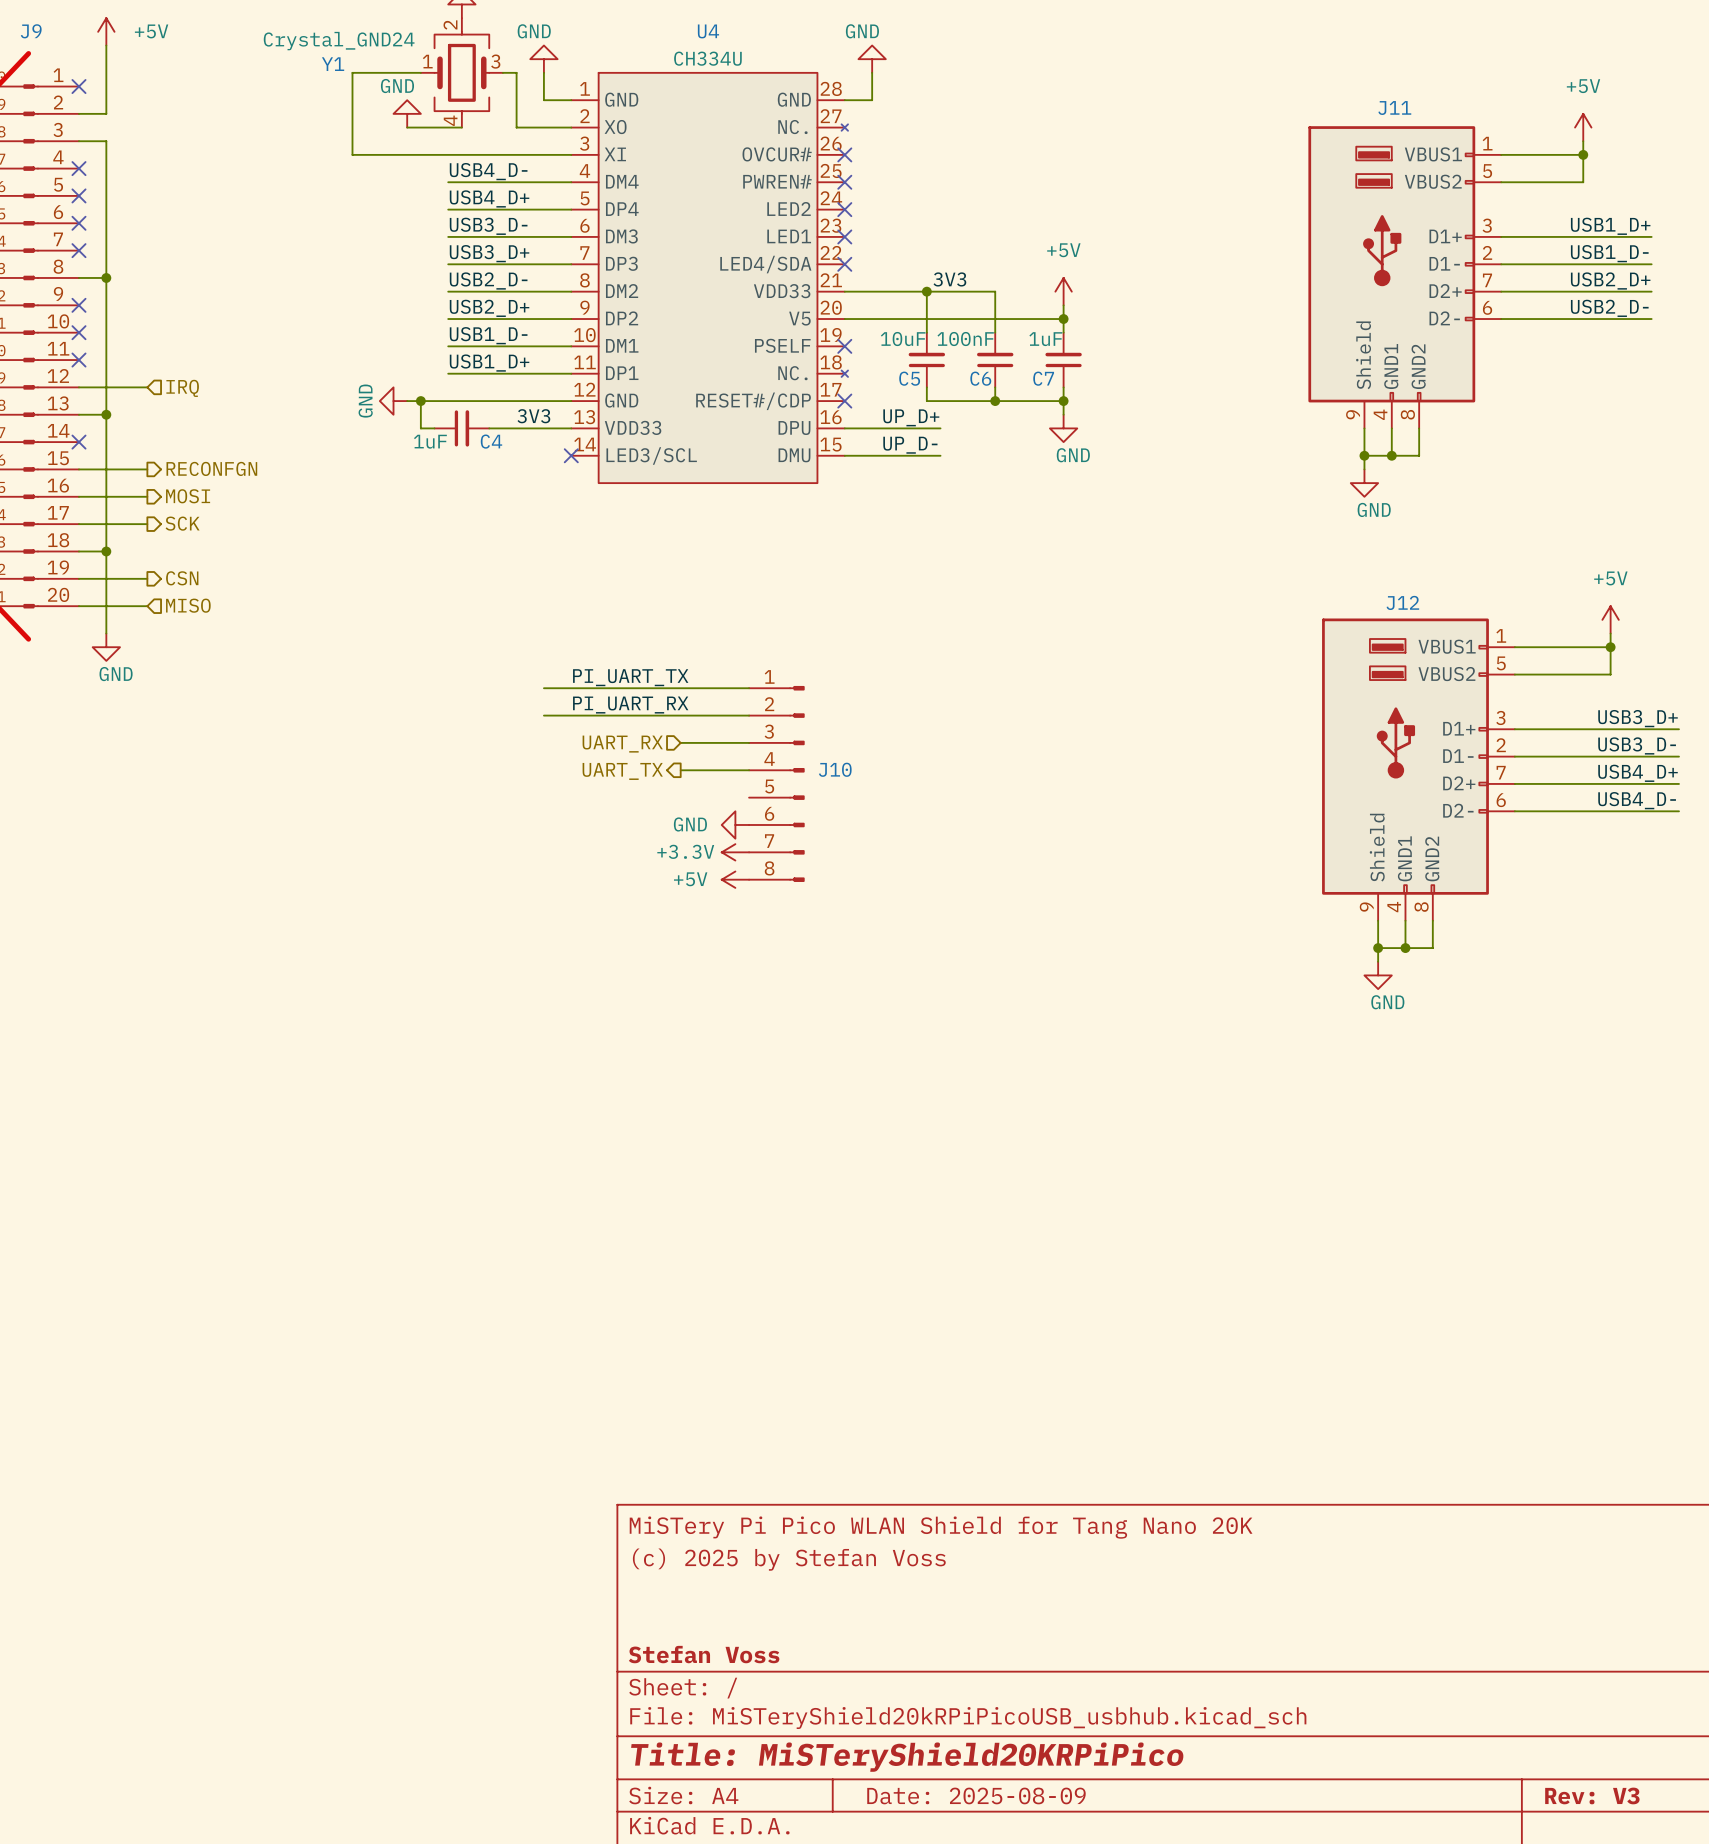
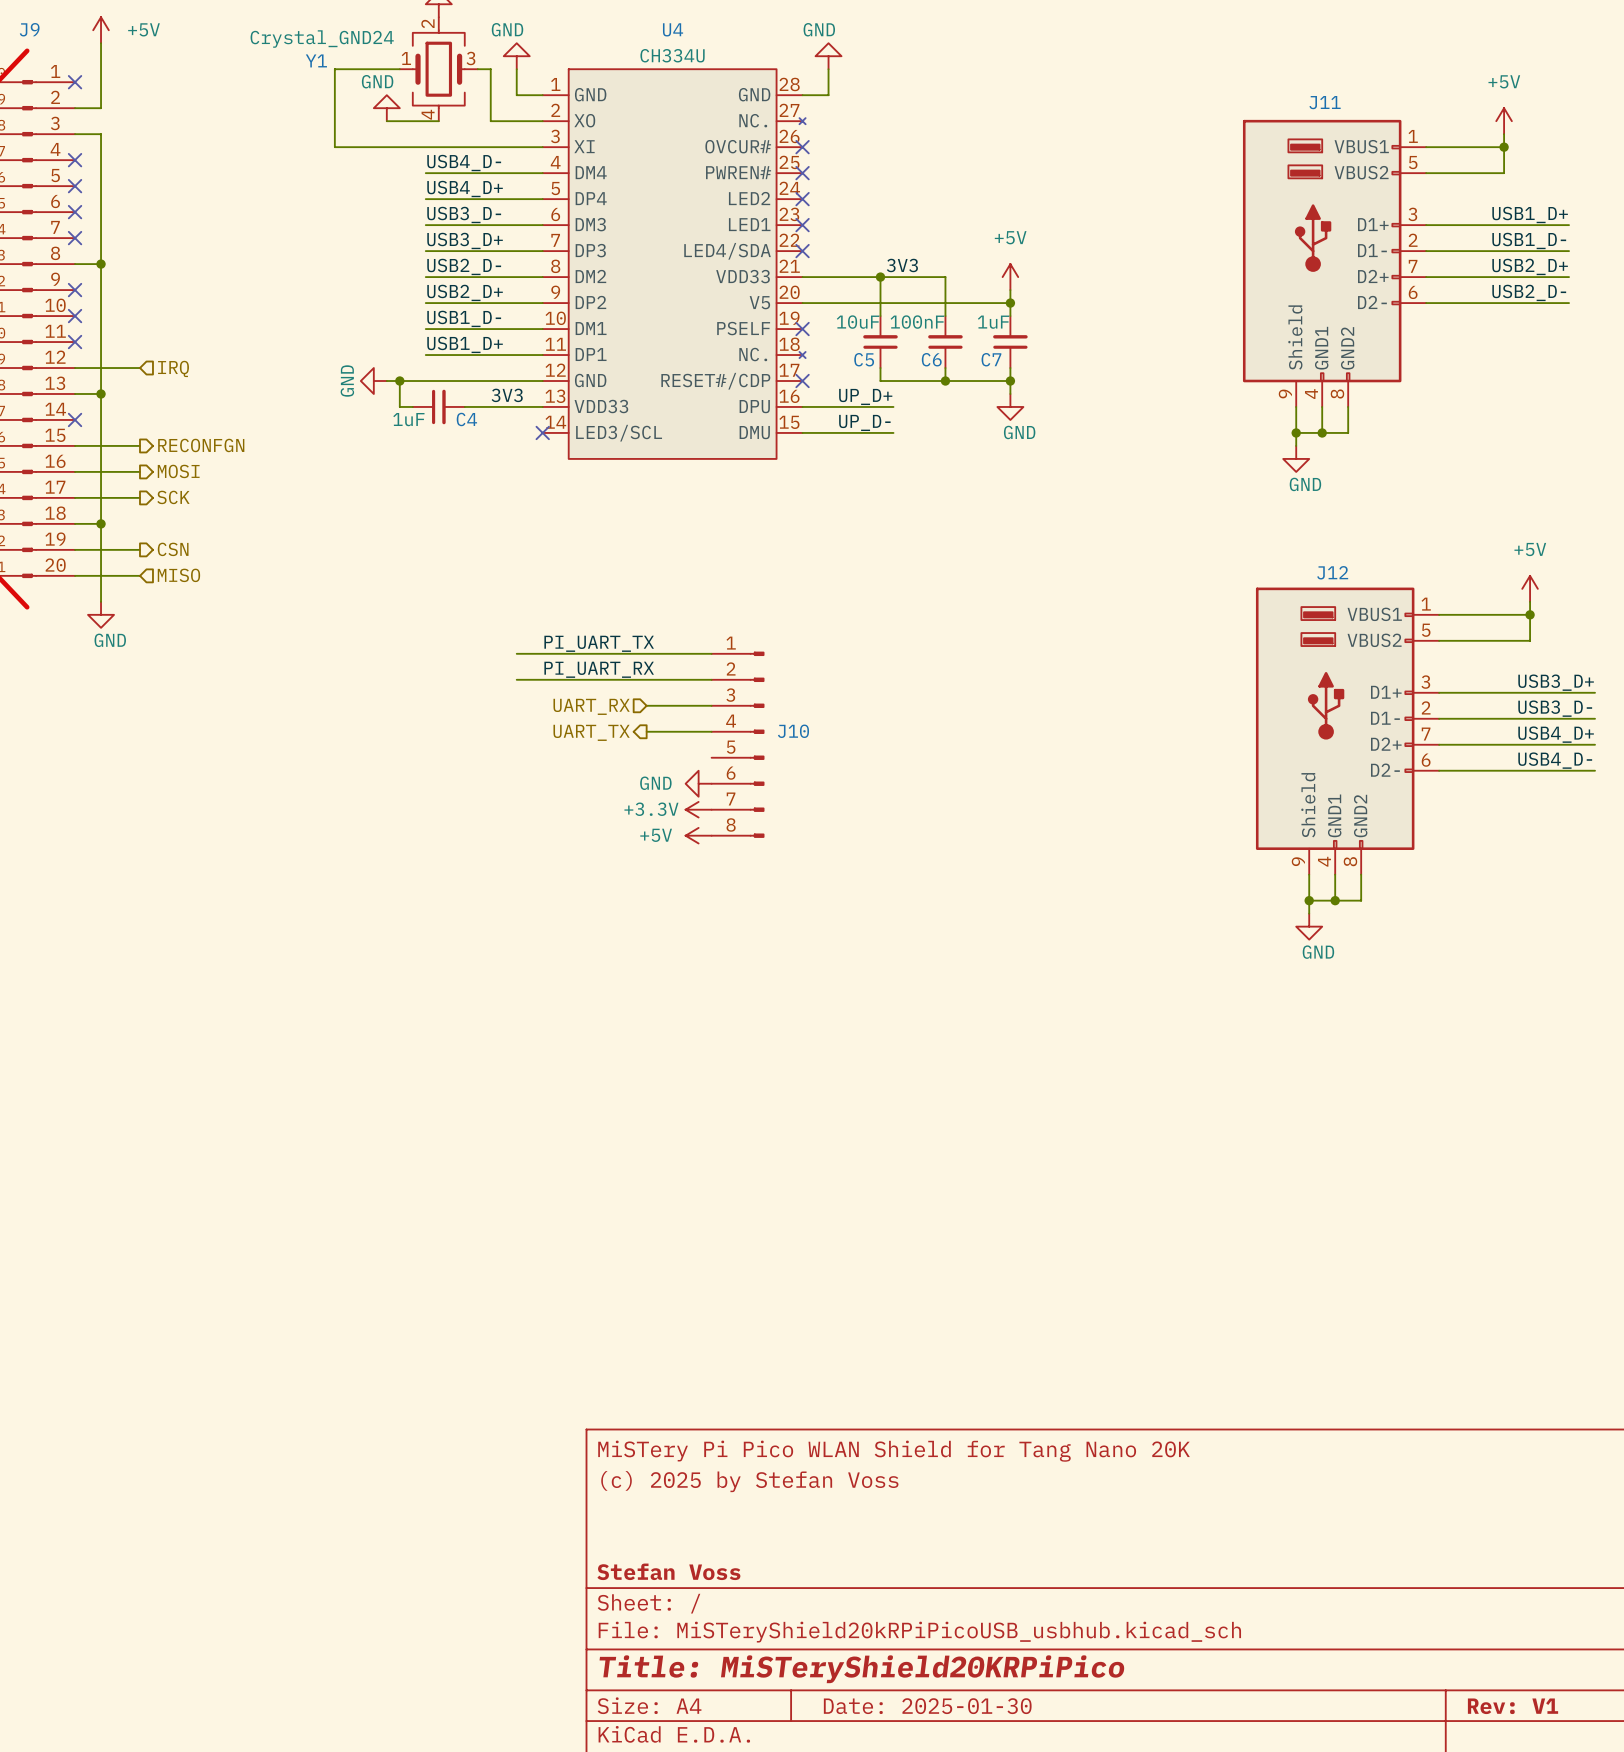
title block: Date: 2025-08-09 (976, 1795) -> Date: 2025-01-30 (927, 1706)
title block: Rev: V3 (1592, 1795) -> Rev: V1 (1513, 1706)

